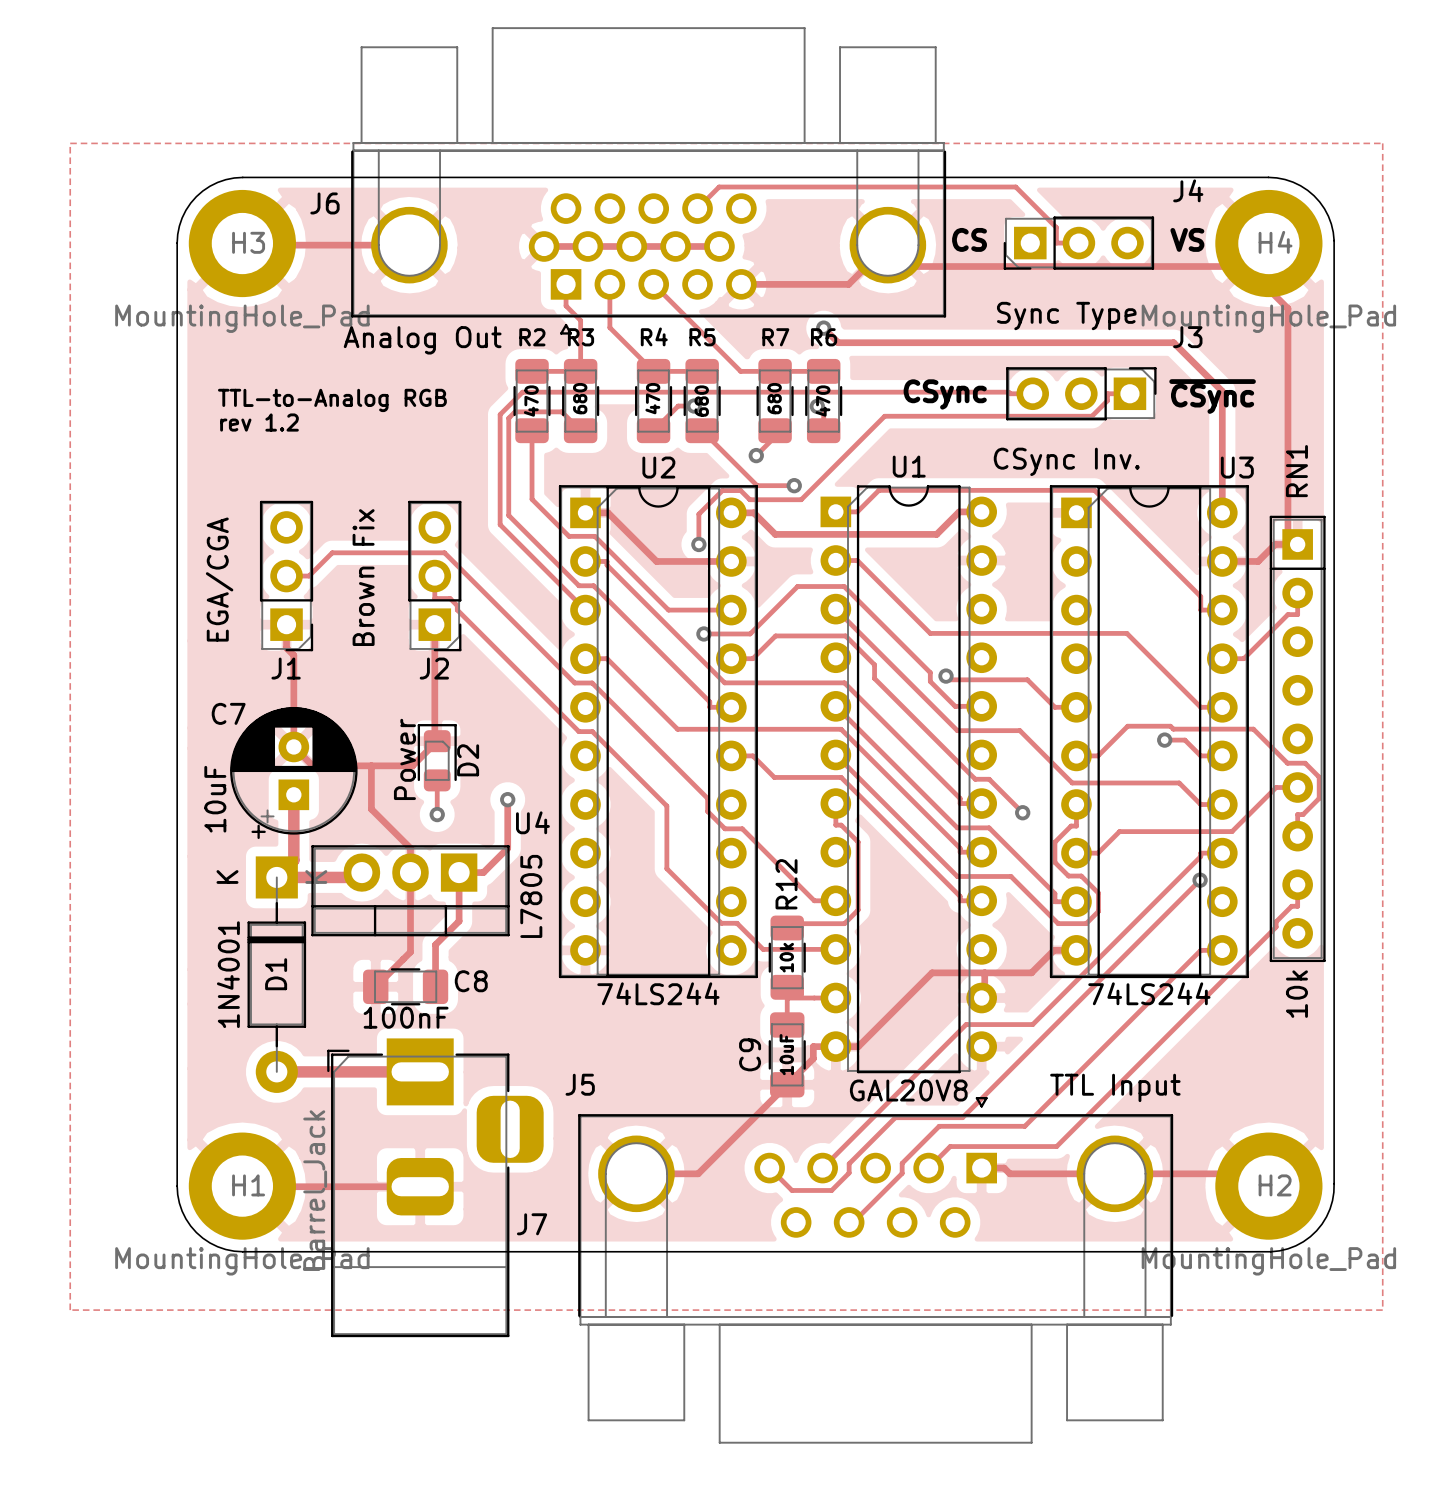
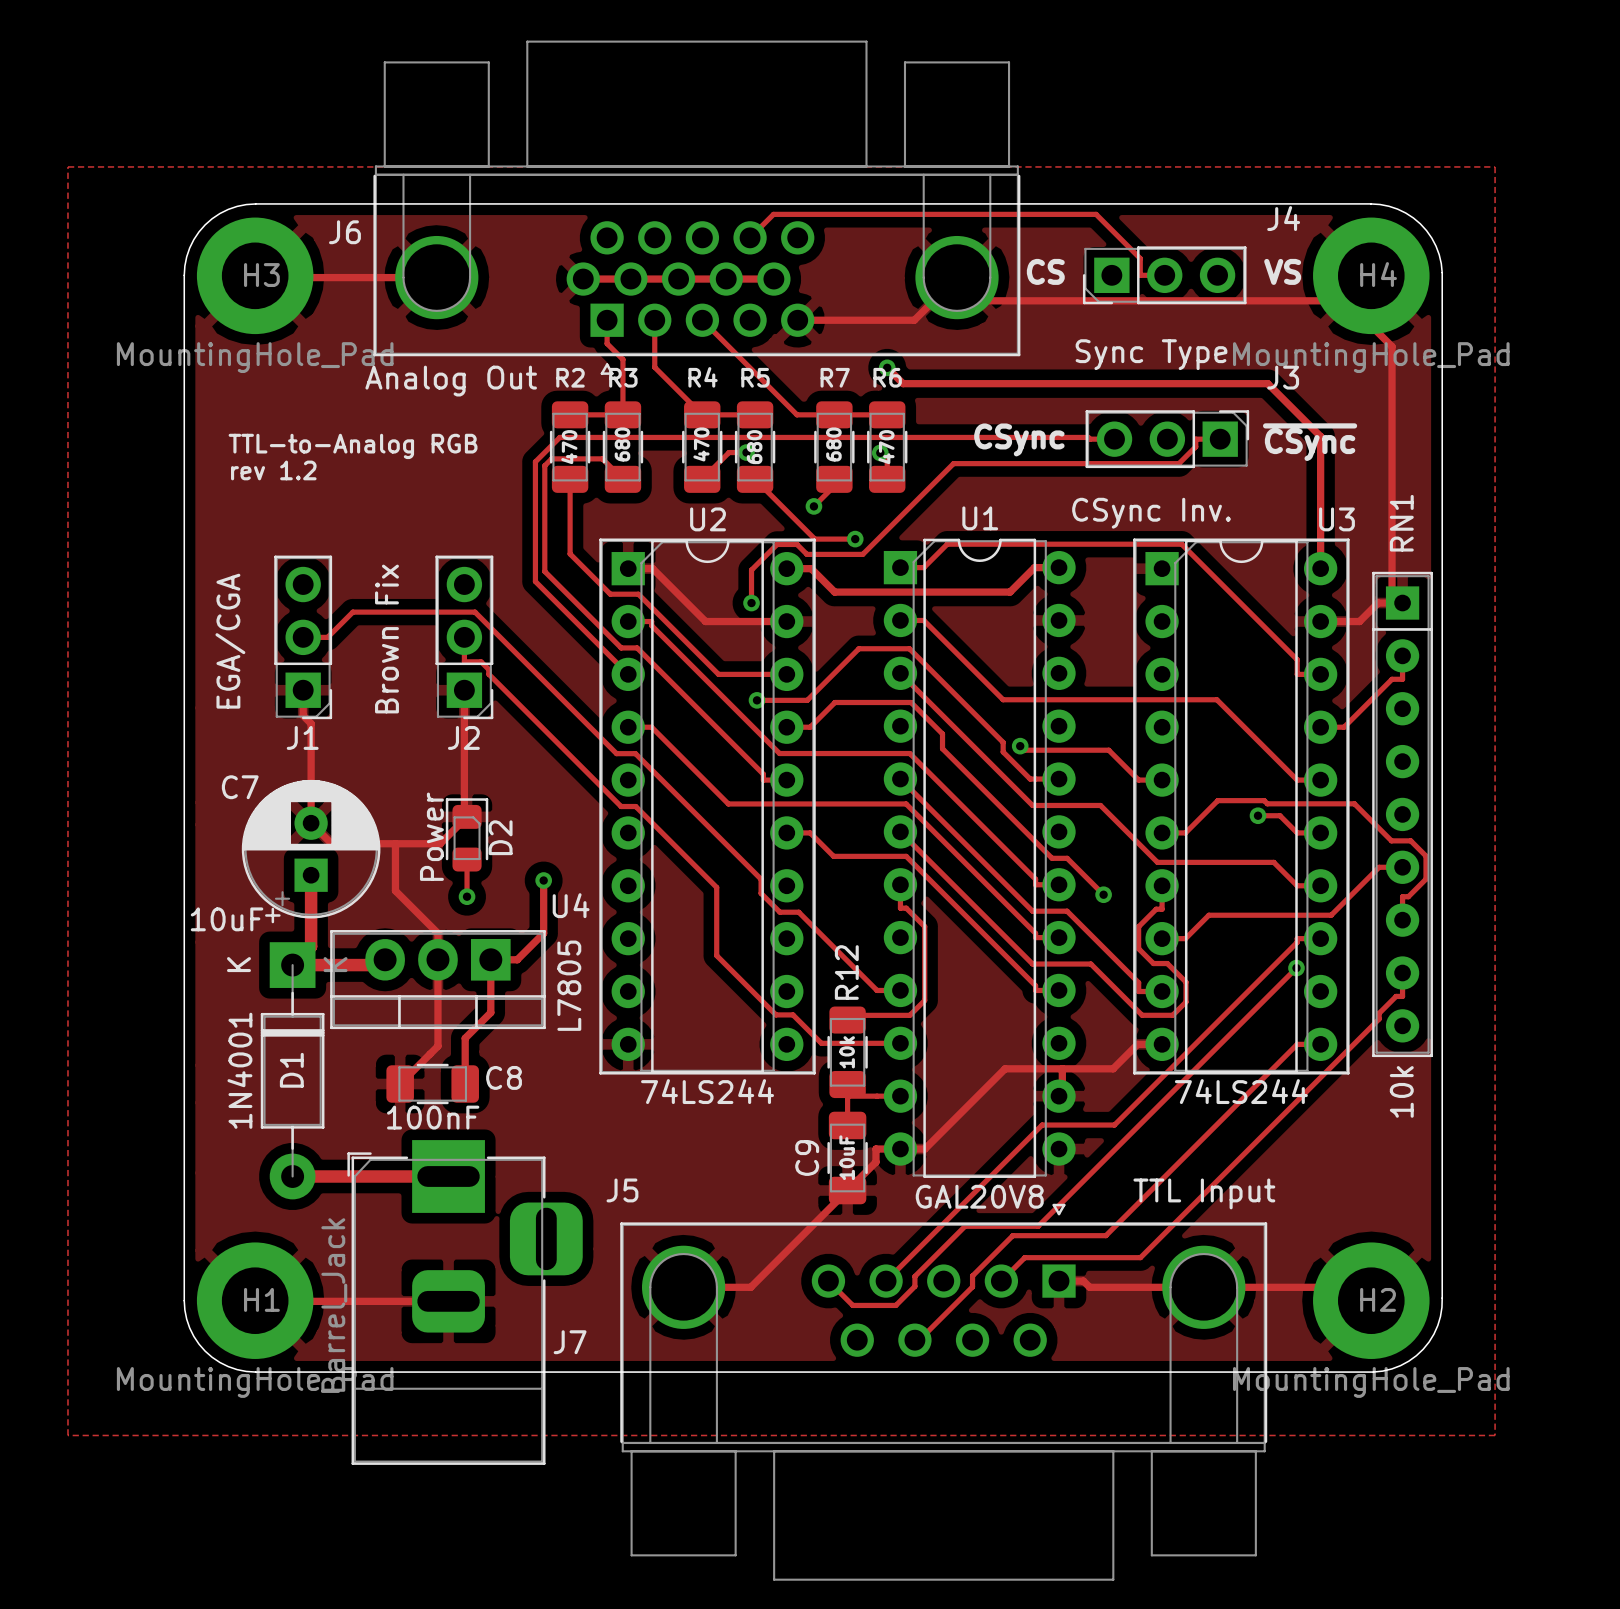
C7 value rotation: 0° (215, 799) -> 90° clockwise (227, 919)

